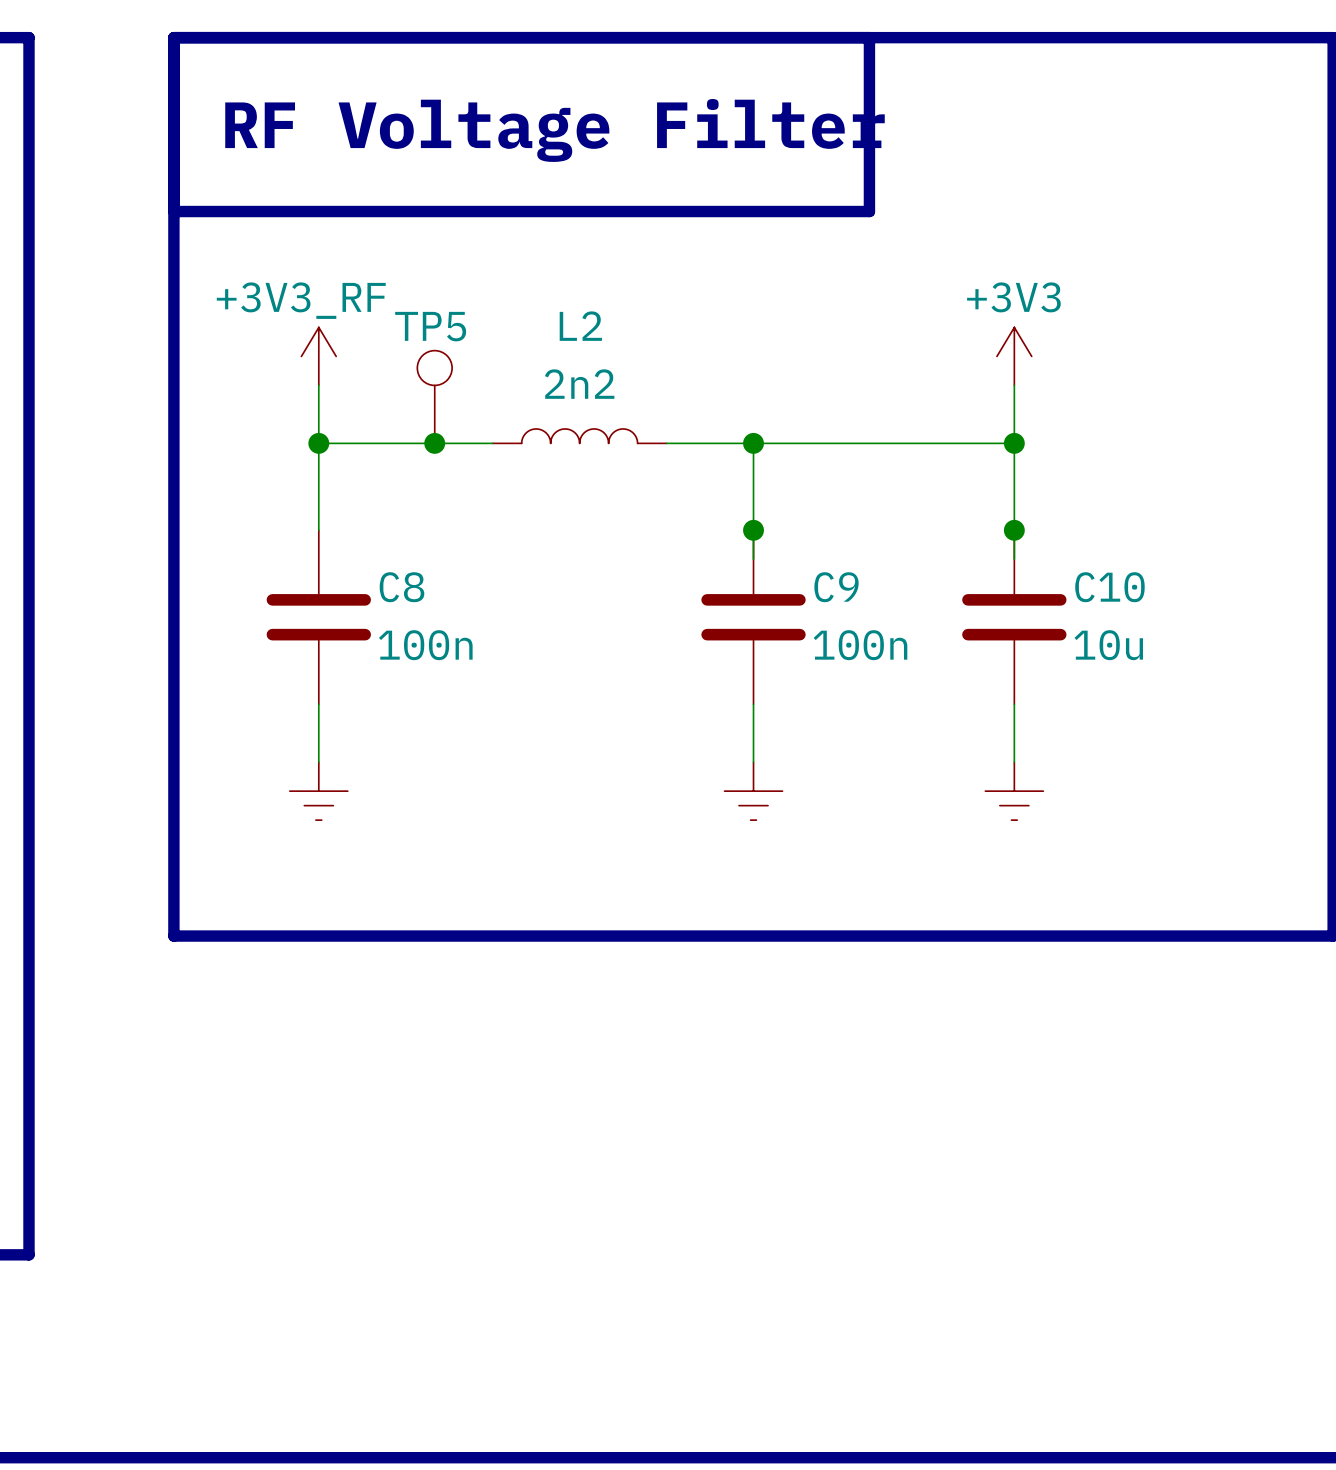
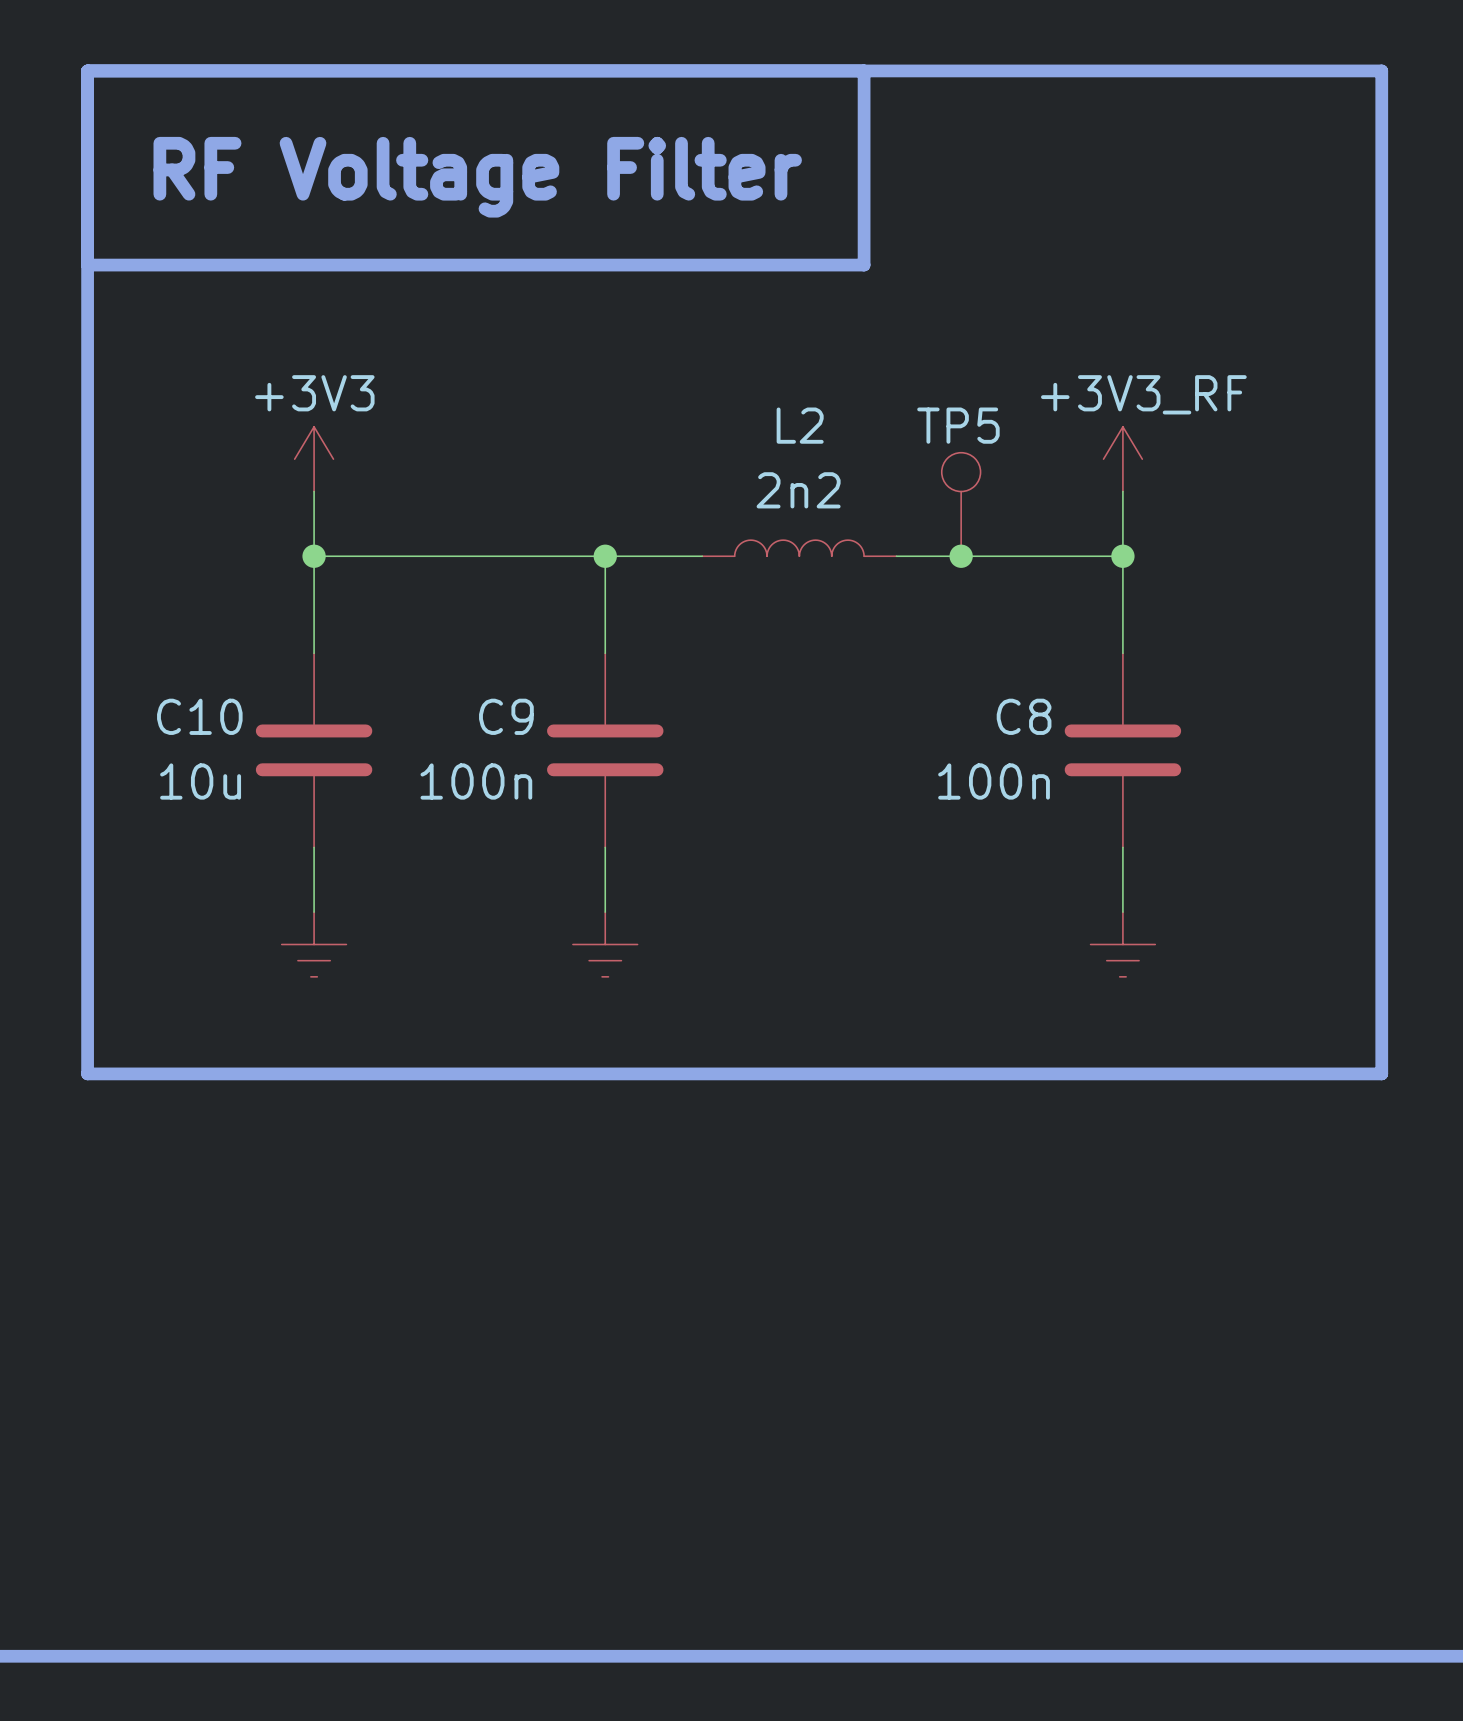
TP5 name position: TP5 (430, 326) -> TP5 (958, 425)
power symbol: +3V3_RF (318, 356) -> none
power symbol: +3V3 (1014, 356) -> none
wire: (318, 385) (318, 530) -> (314, 491) (314, 653)
power symbol: none -> +3V3 (314, 459)
wire: (1014, 385) (1014, 559) -> none
power symbol: none -> +3V3_RF (1122, 459)
TP5 position: (434, 397) -> (961, 504)
wire: none -> (1122, 491) (1122, 653)
L2 position: (579, 436) -> (799, 548)
wire: (318, 443) (492, 443) -> none
junction: (318, 443) -> none
junction: (434, 443) -> none
wire: (666, 443) (1014, 443) -> (314, 556) (702, 556)
wire: (753, 443) (753, 559) -> none
junction: (753, 443) -> none
junction: (1014, 443) -> none
junction: none -> (314, 556)
wire: none -> (605, 556) (605, 653)
junction: none -> (605, 556)
wire: none -> (896, 556) (1122, 556)
junction: none -> (961, 556)
junction: none -> (1122, 556)
junction: (753, 530) -> none
junction: (1014, 530) -> none
C8 name position: C8 (401, 587) -> C8 (1024, 716)
C9 name position: C9 (836, 587) -> C9 (506, 716)
C10 name position: C10 (1109, 587) -> C10 (199, 716)
C8 position: (318, 617) -> (1122, 750)
C9 position: (753, 617) -> (605, 750)
C10 position: (1014, 617) -> (314, 750)
C8 value position: 100n (425, 645) -> 100n (994, 781)
C9 value position: 100n (860, 645) -> 100n (476, 781)
C10 value position: 10u (1108, 645) -> 10u (200, 781)
wire: (318, 704) (318, 762) -> (314, 847) (314, 912)
wire: (753, 704) (753, 762) -> (1122, 847) (1122, 912)
wire: (1014, 704) (1014, 762) -> (605, 847) (605, 912)
power symbol position: (318, 791) -> (314, 944)
power symbol position: (753, 791) -> (605, 944)
power symbol position: (1014, 791) -> (1122, 944)

